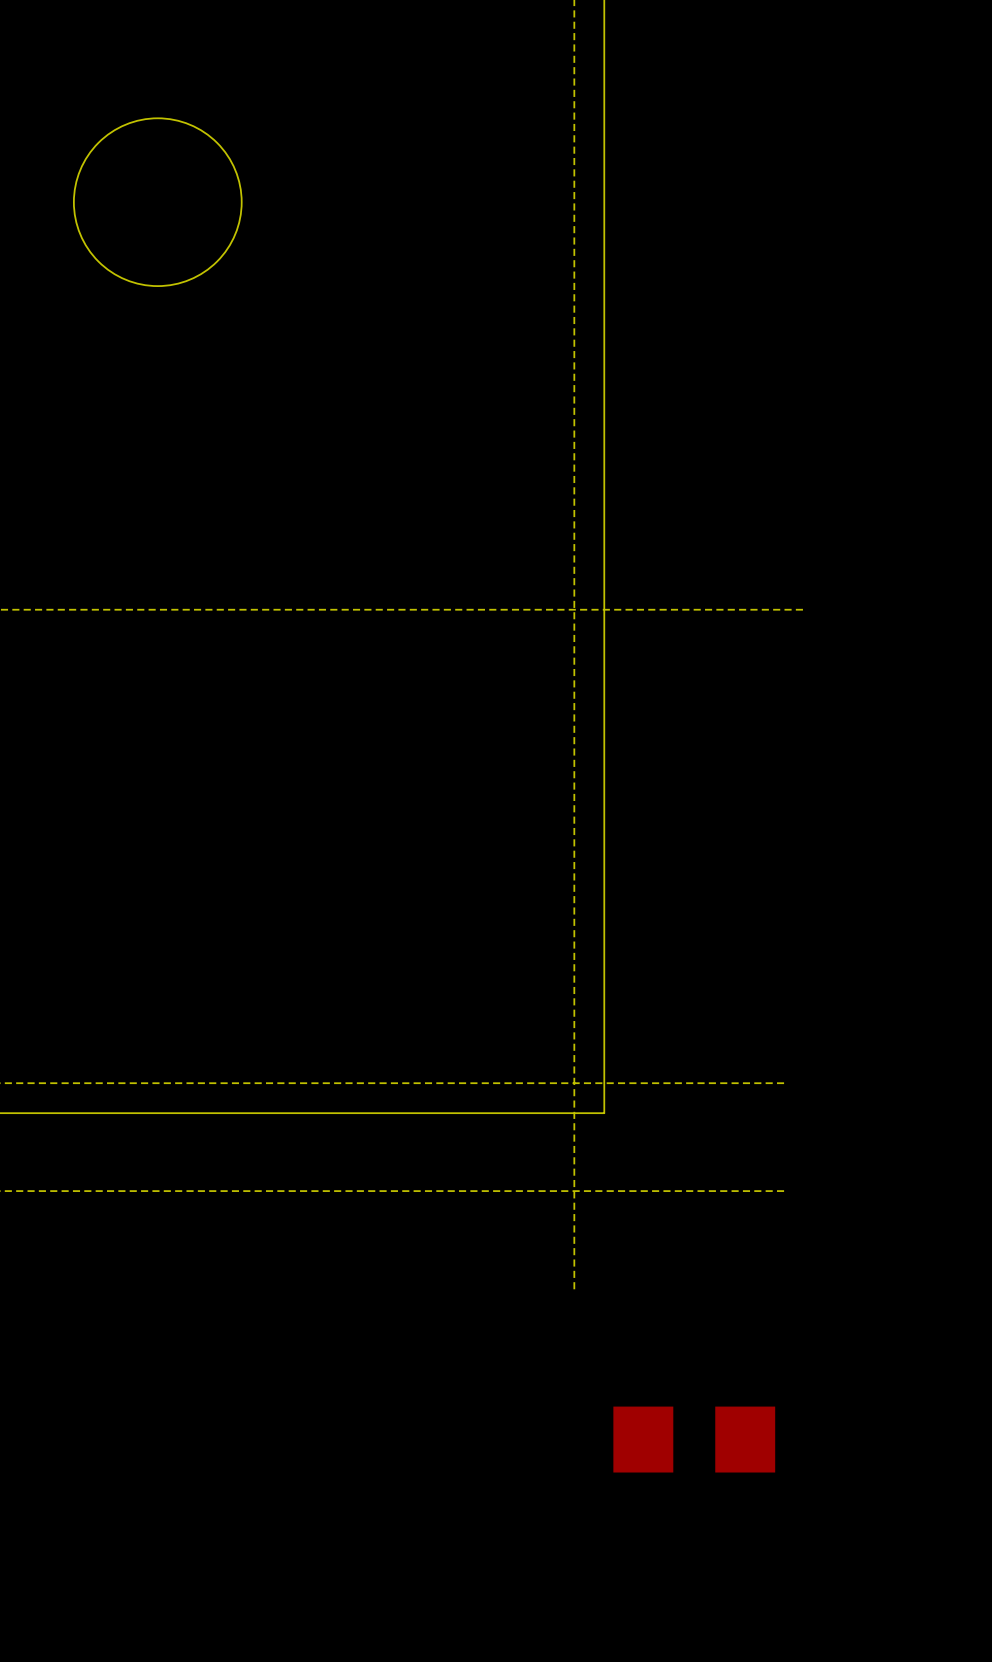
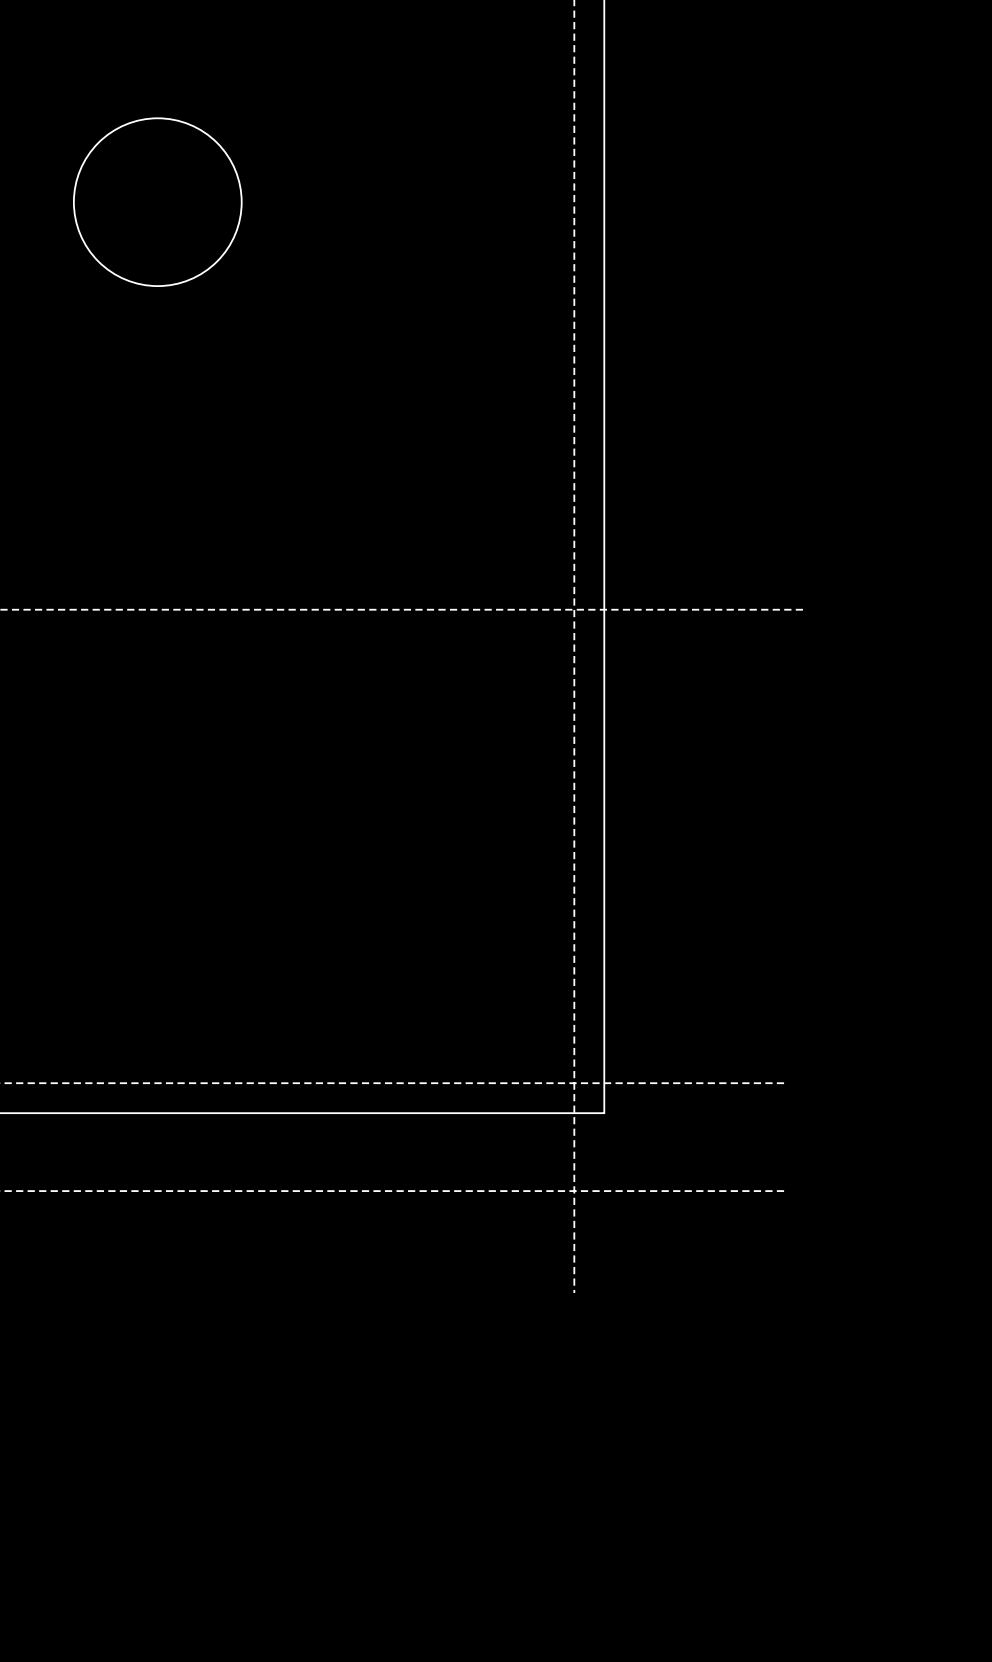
part: (694, 1439) -> none

